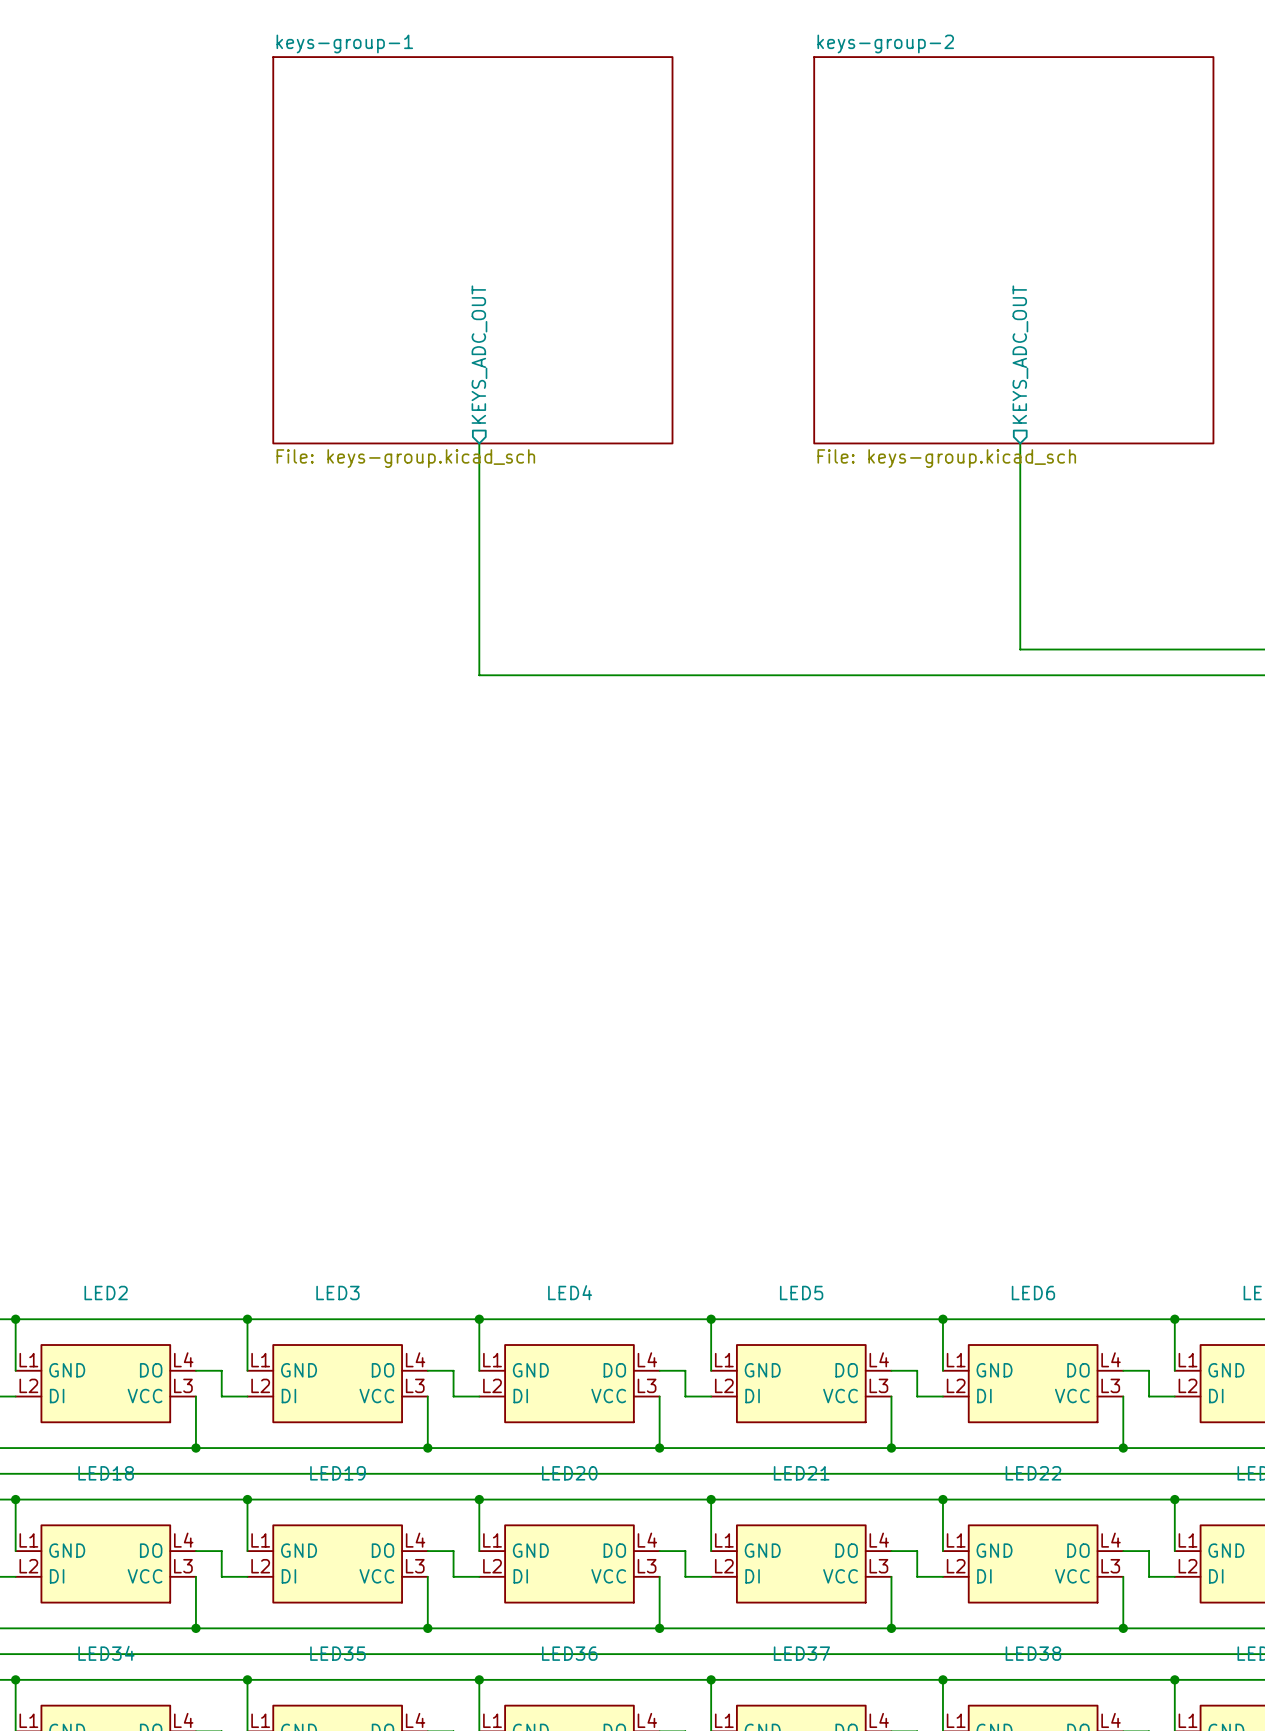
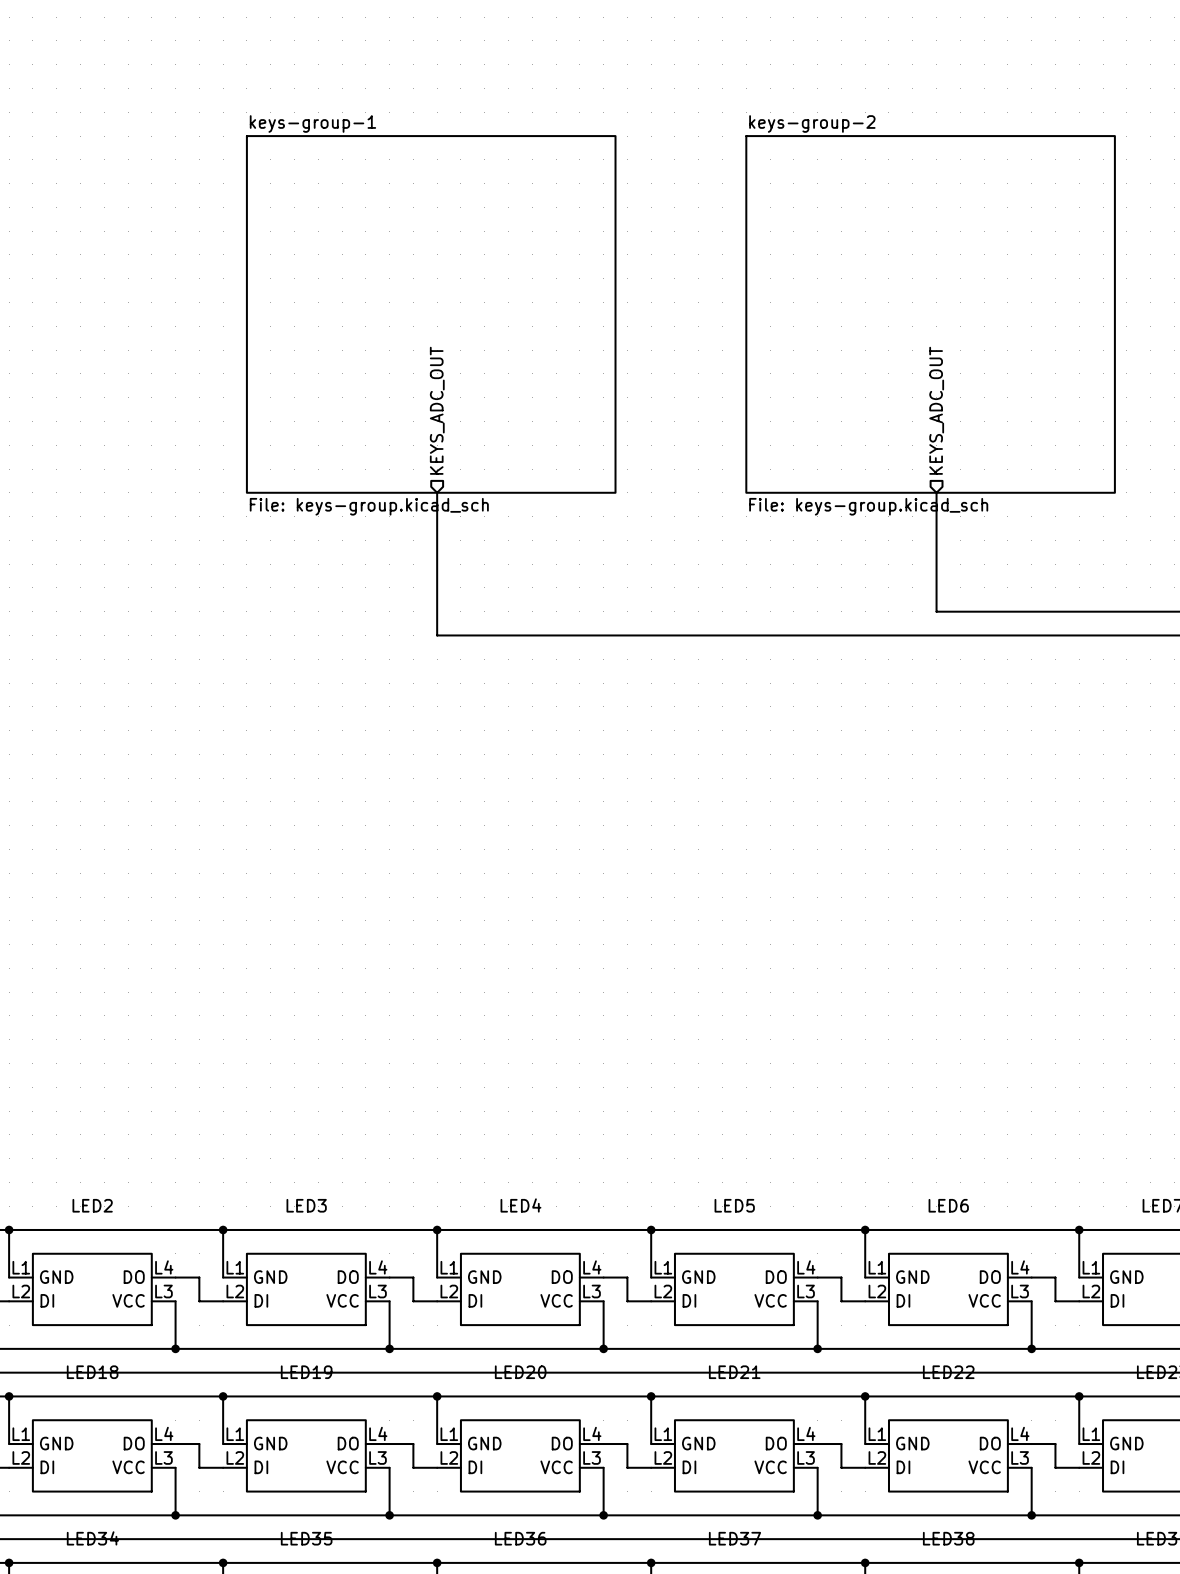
sheet keys-group-1 position: (472, 250) -> (431, 314)
sheet keys-group-2 position: (1013, 250) -> (930, 314)
sheet pin position: KEYS_ADC_OUT (479, 354) -> KEYS_ADC_OUT (437, 410)
sheet pin position: KEYS_ADC_OUT (1020, 354) -> KEYS_ADC_OUT (936, 410)
wire: (479, 443) (479, 520) -> none
wire: (1020, 443) (1020, 520) -> none

